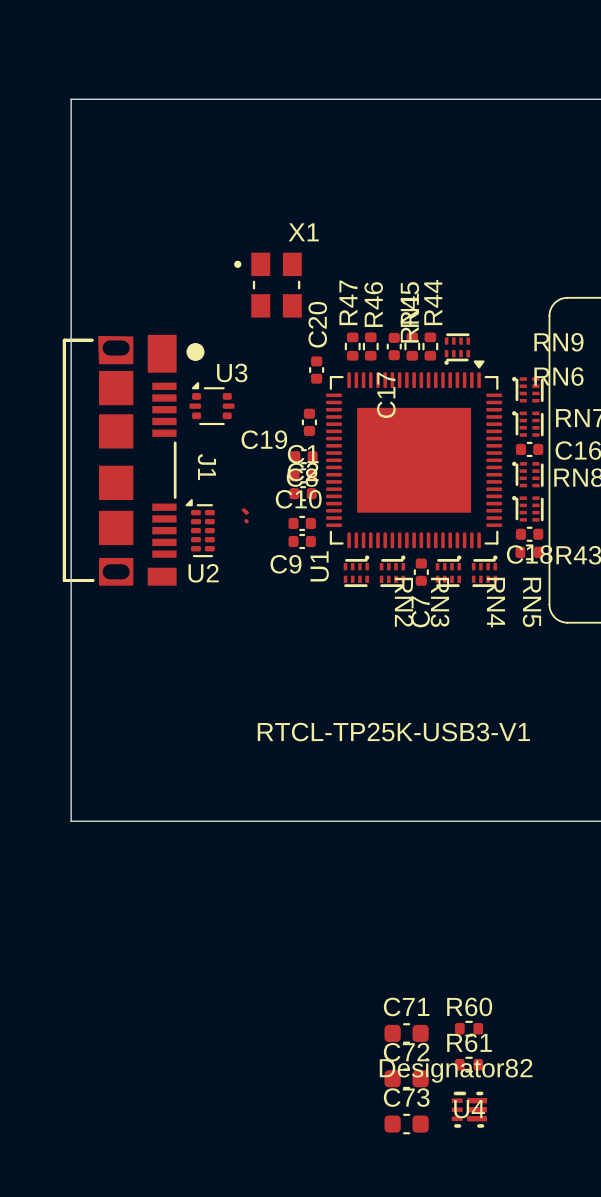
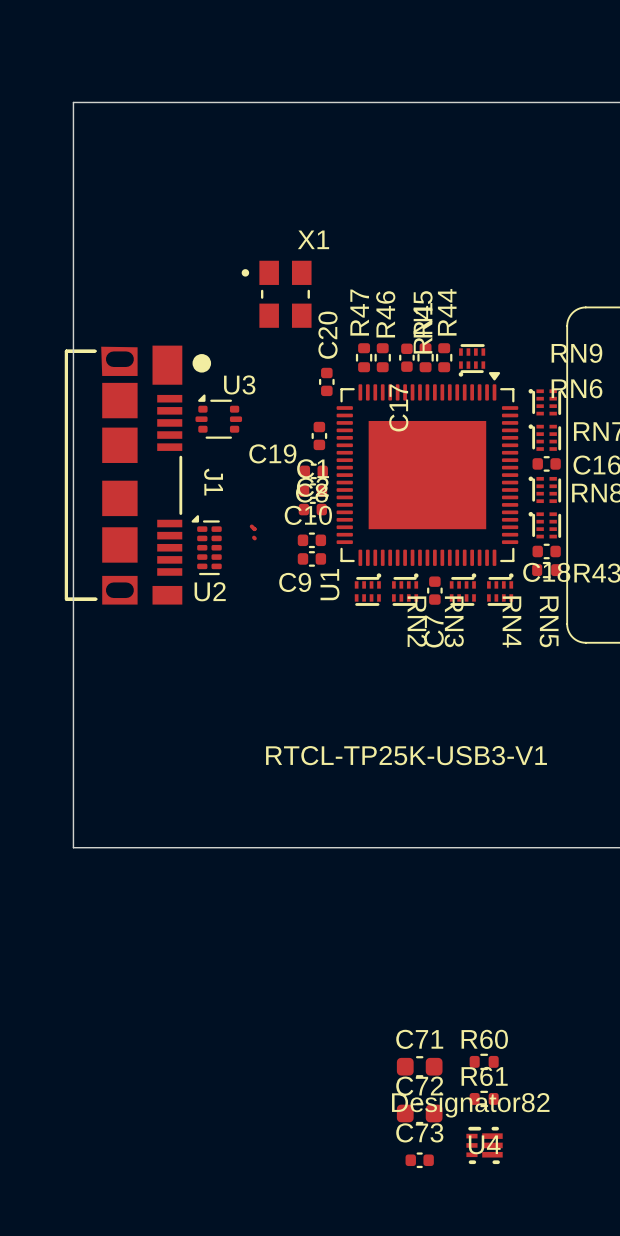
C73 footprint: [384, 1113, 429, 1135] -> [405, 1152, 434, 1169]

